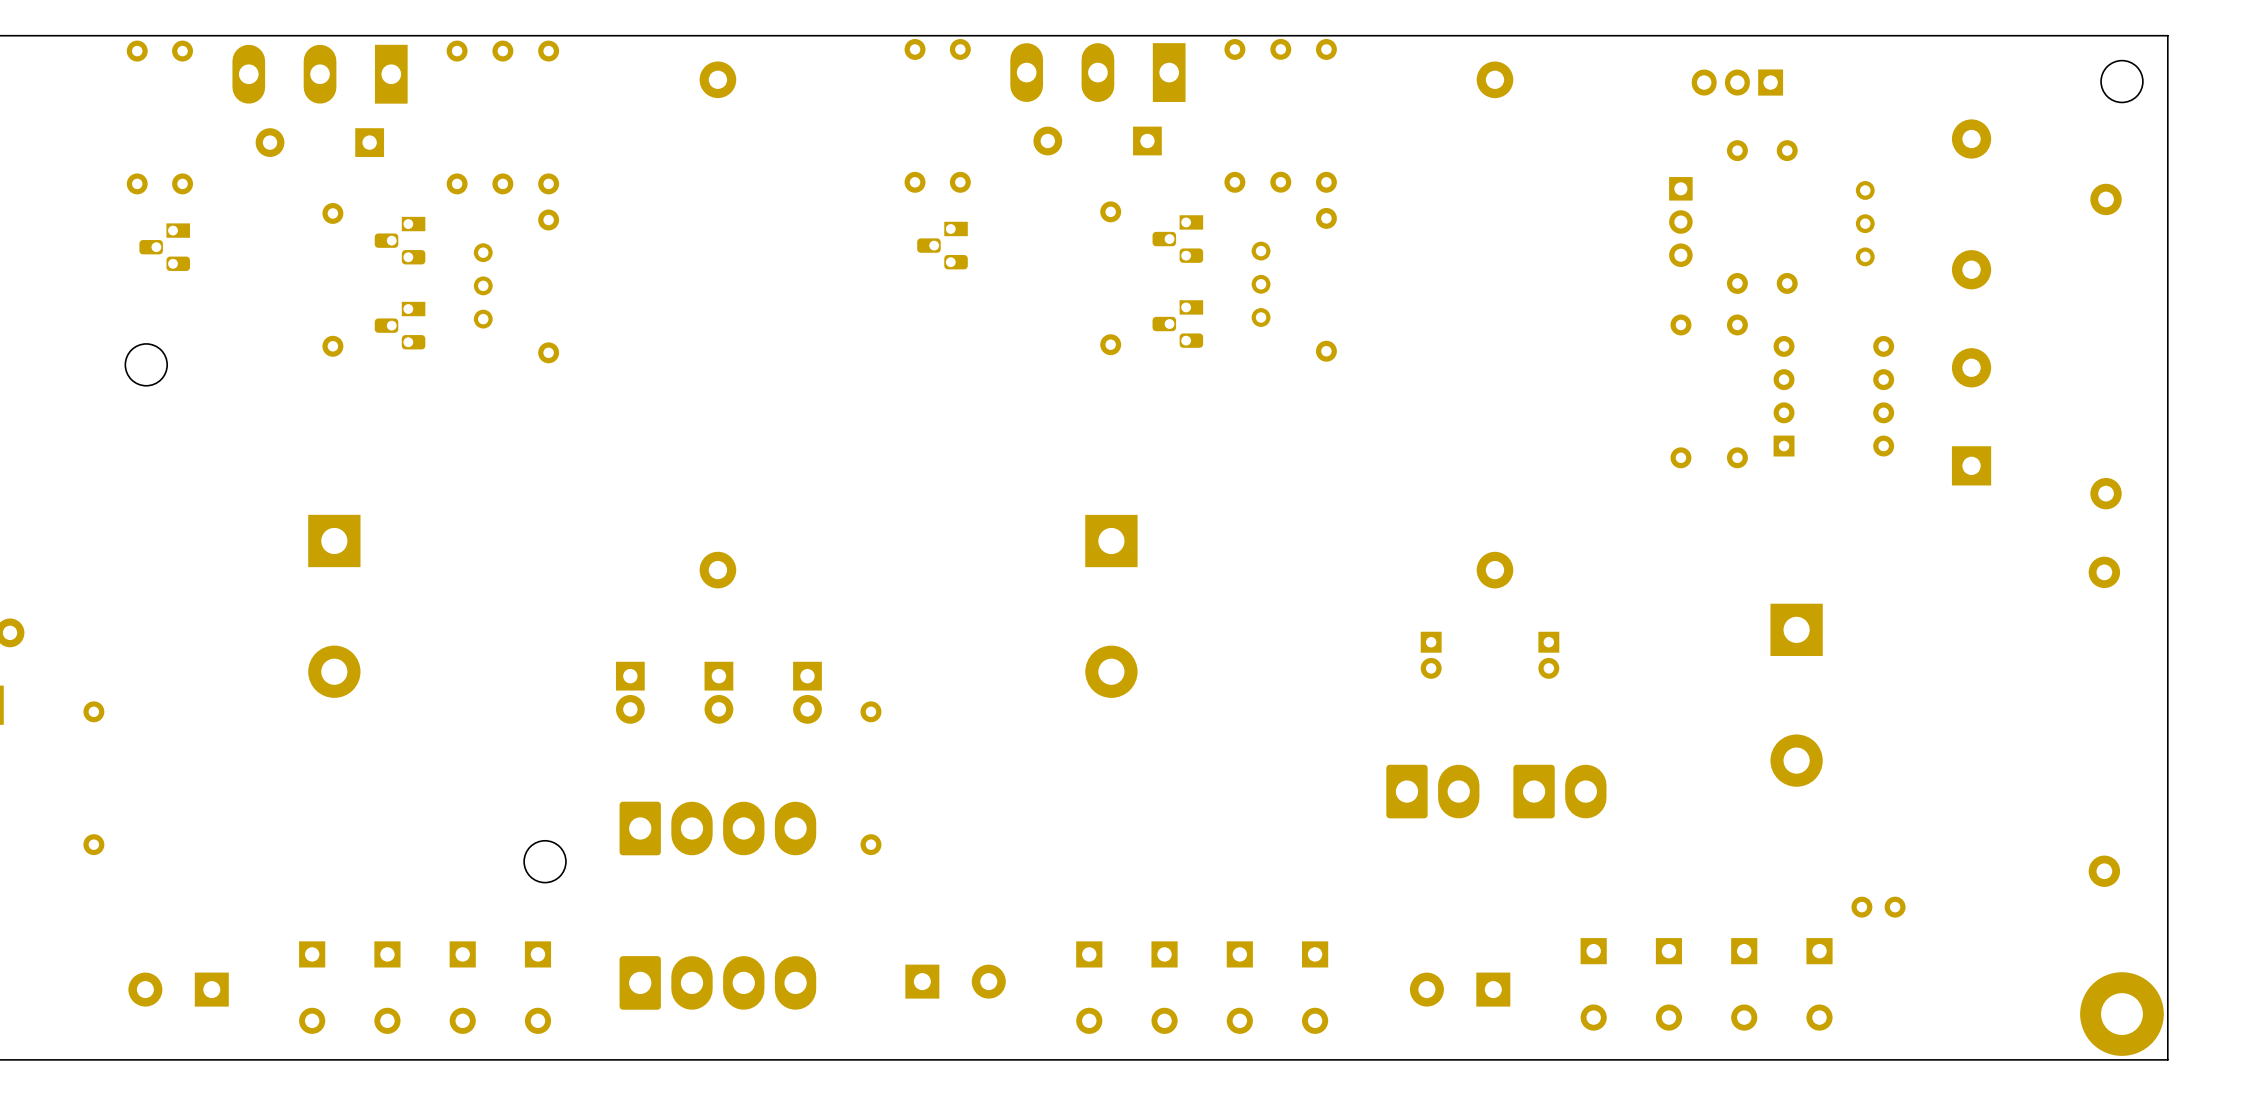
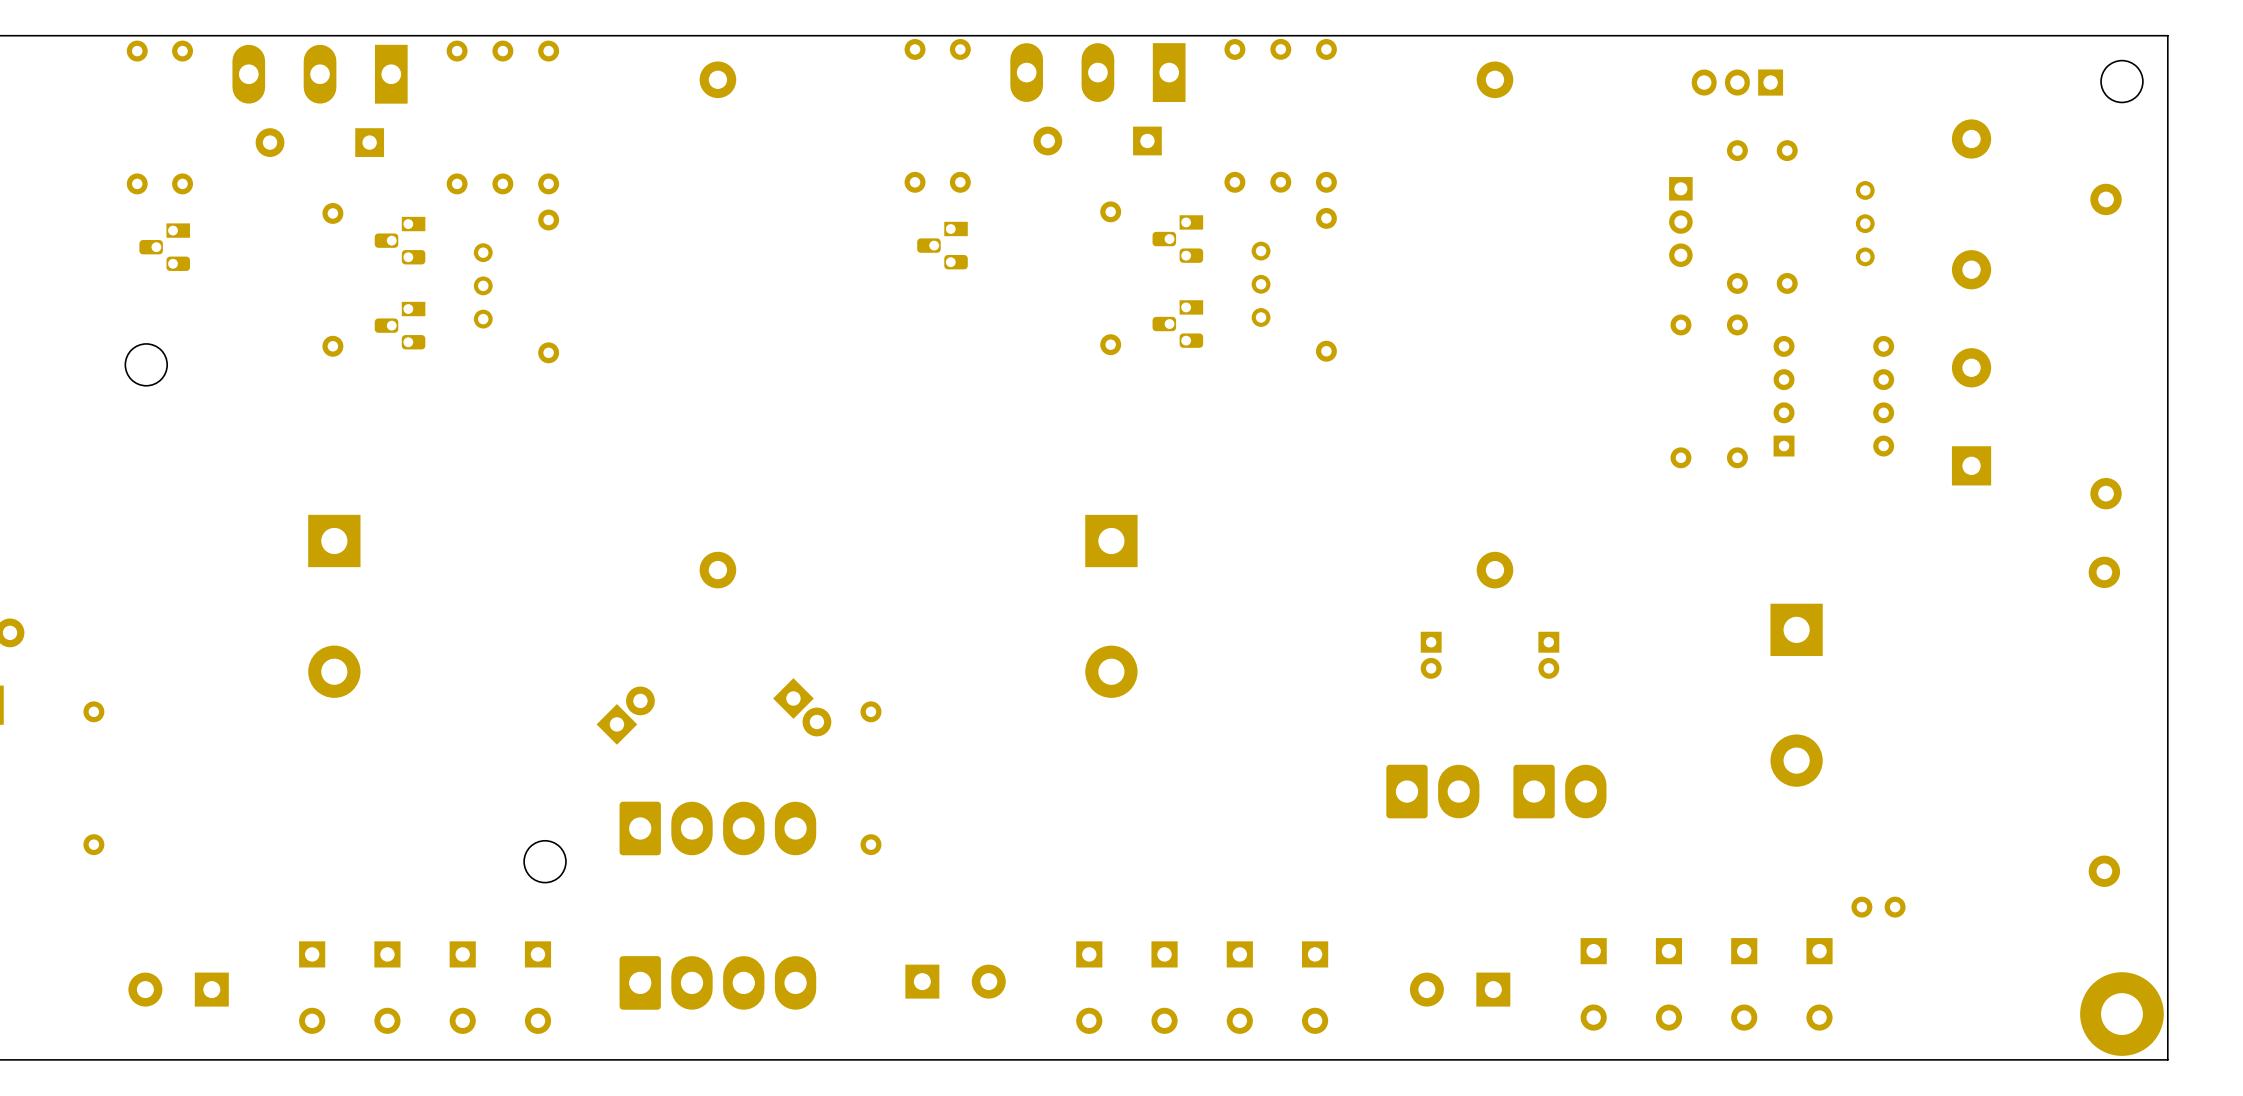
part: (630, 692) -> none
part: (718, 692) -> none
part: (807, 692) -> none
part: none -> (802, 707)
part: none -> (625, 715)

